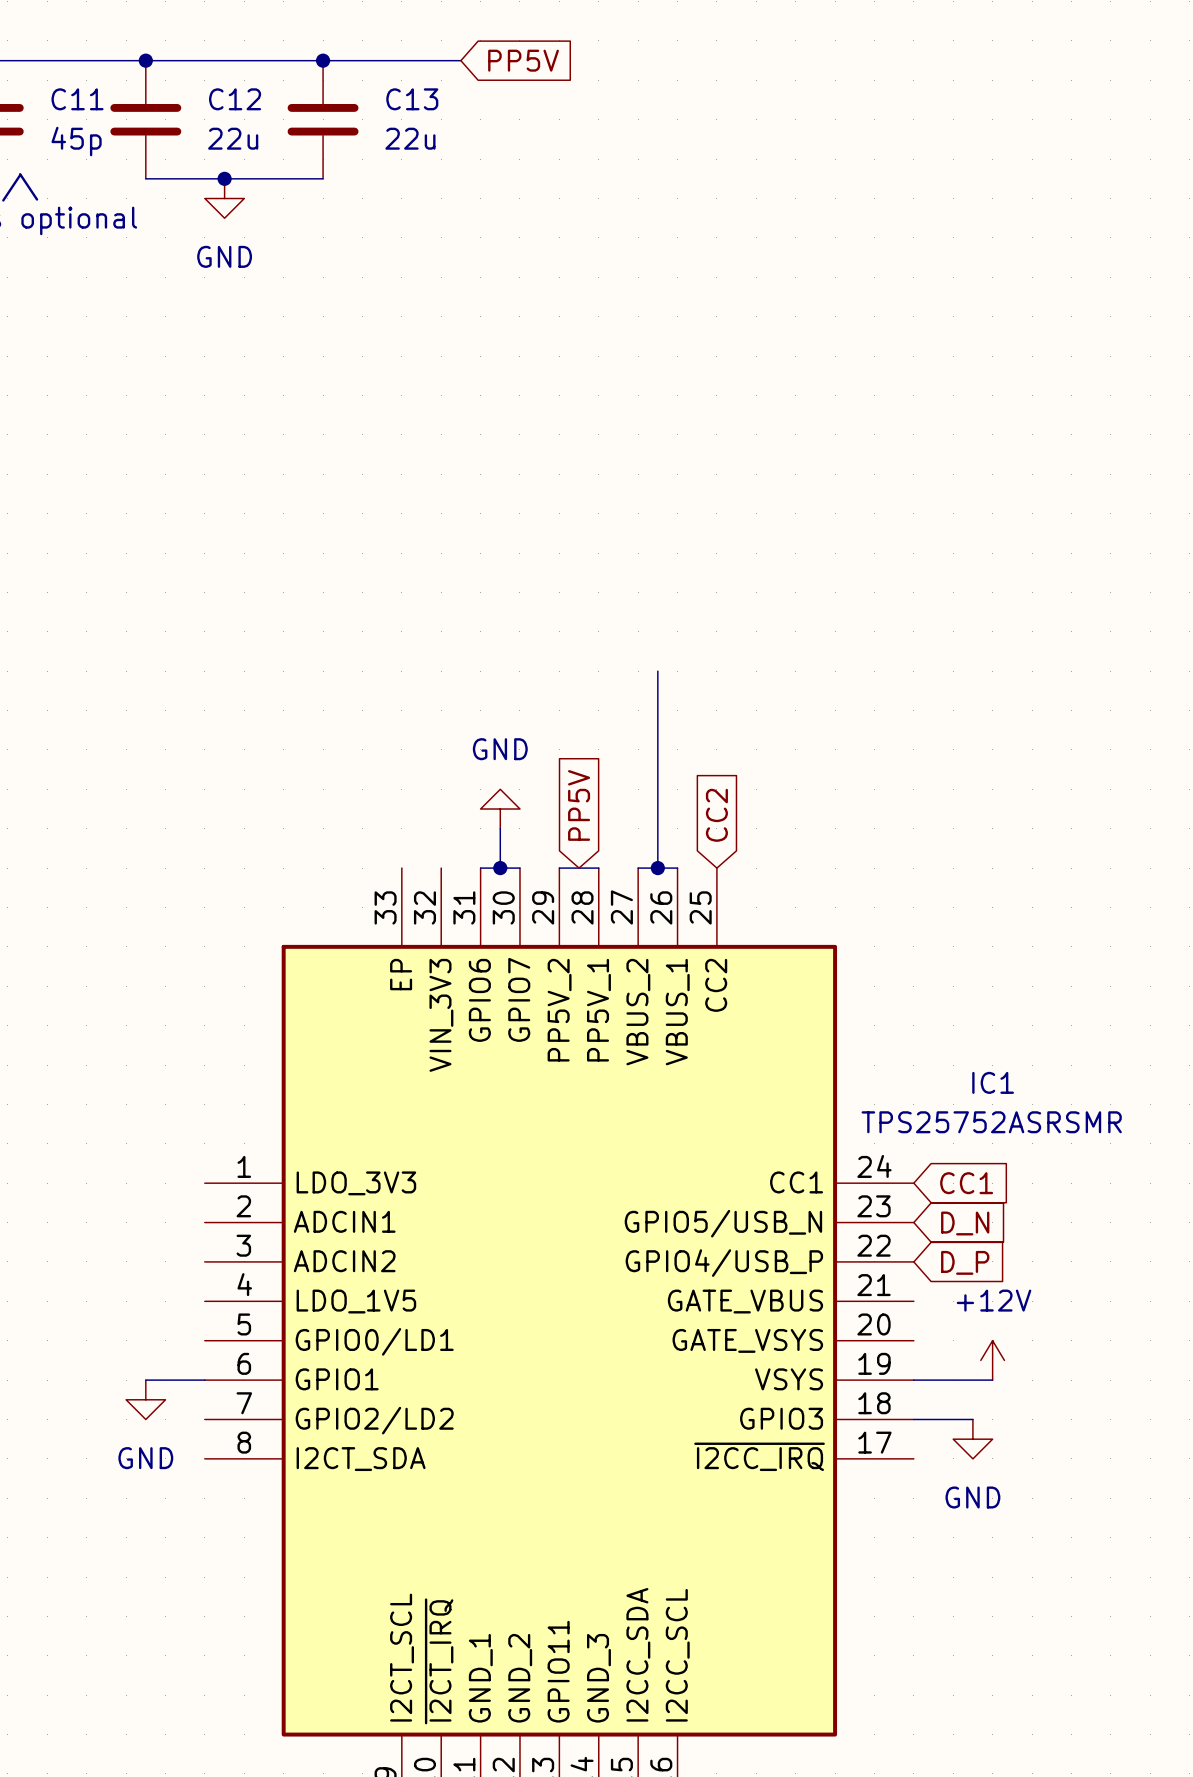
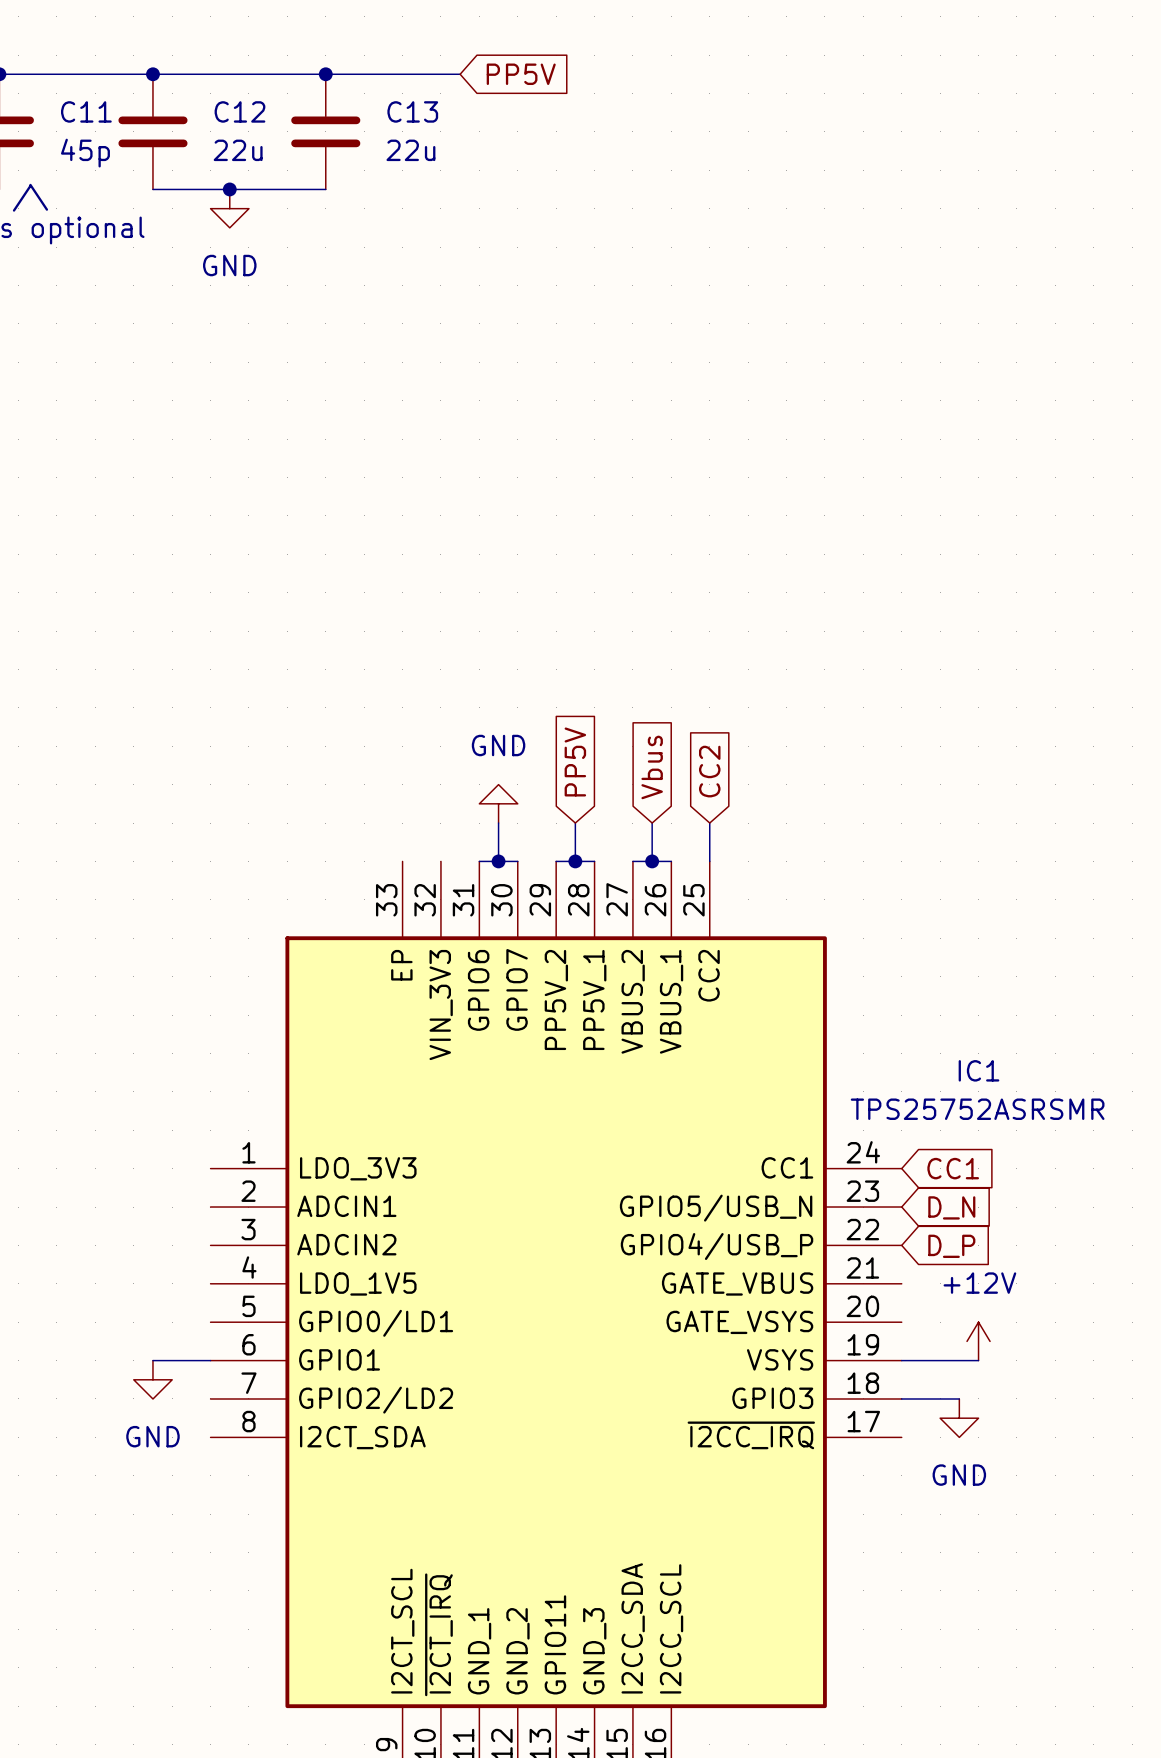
wire: (657, 671) (657, 828) -> none
global label: none -> Vbus (652, 767)
global label position: PP5V (579, 805) -> PP5V (575, 761)
global label position: CC2 (716, 815) -> CC2 (709, 771)
wire: none -> (575, 823) (575, 861)
wire: none -> (709, 823) (709, 861)
junction: none -> (575, 861)

